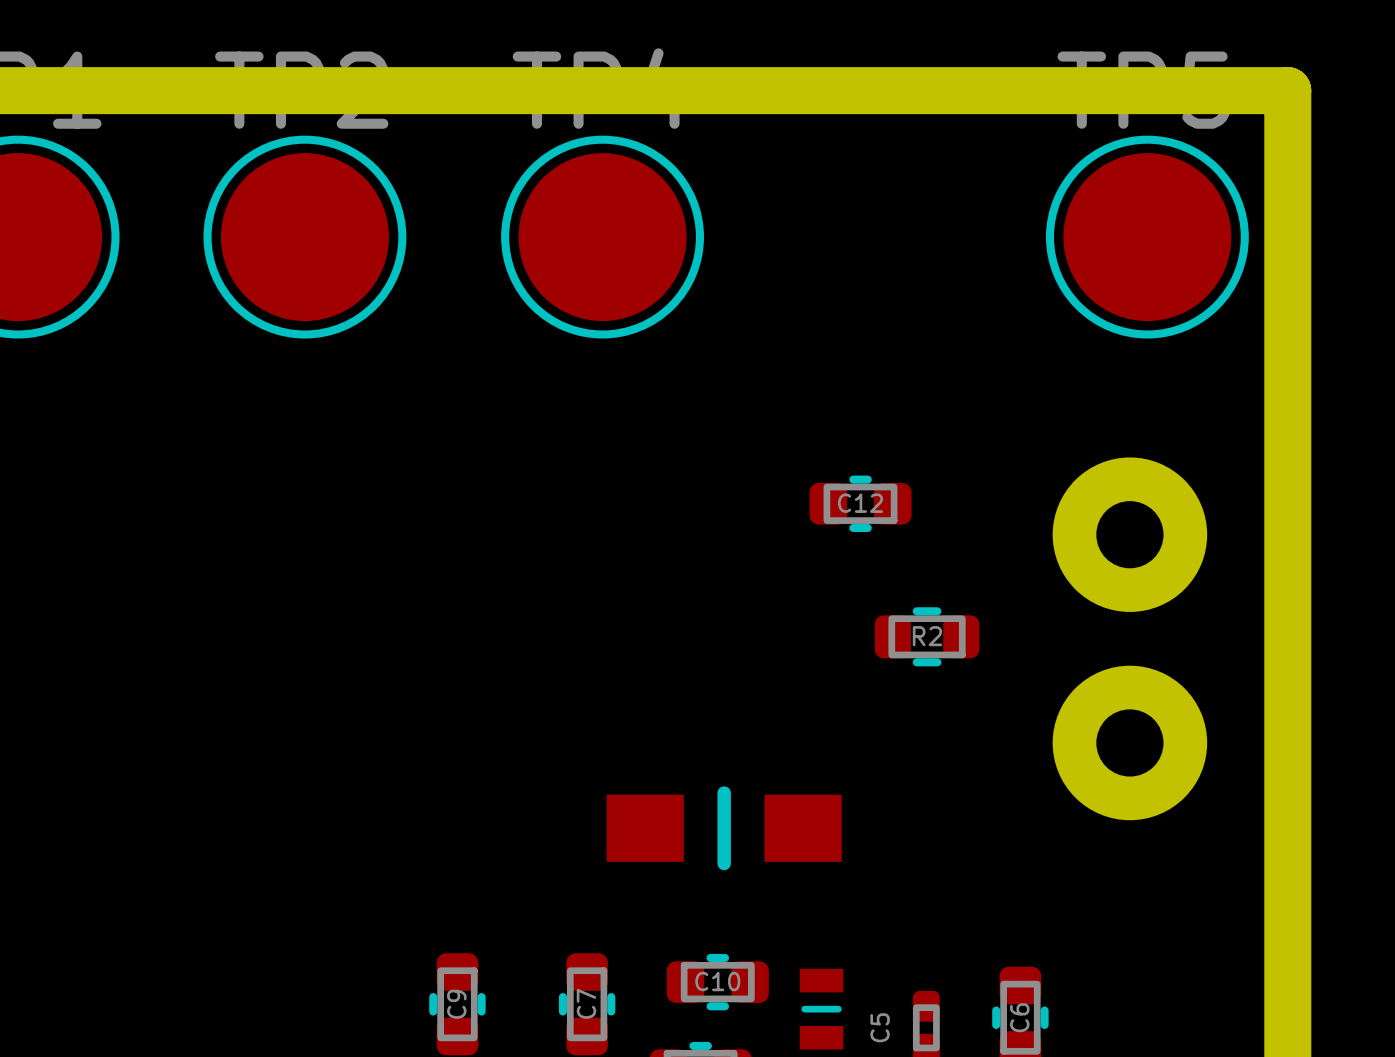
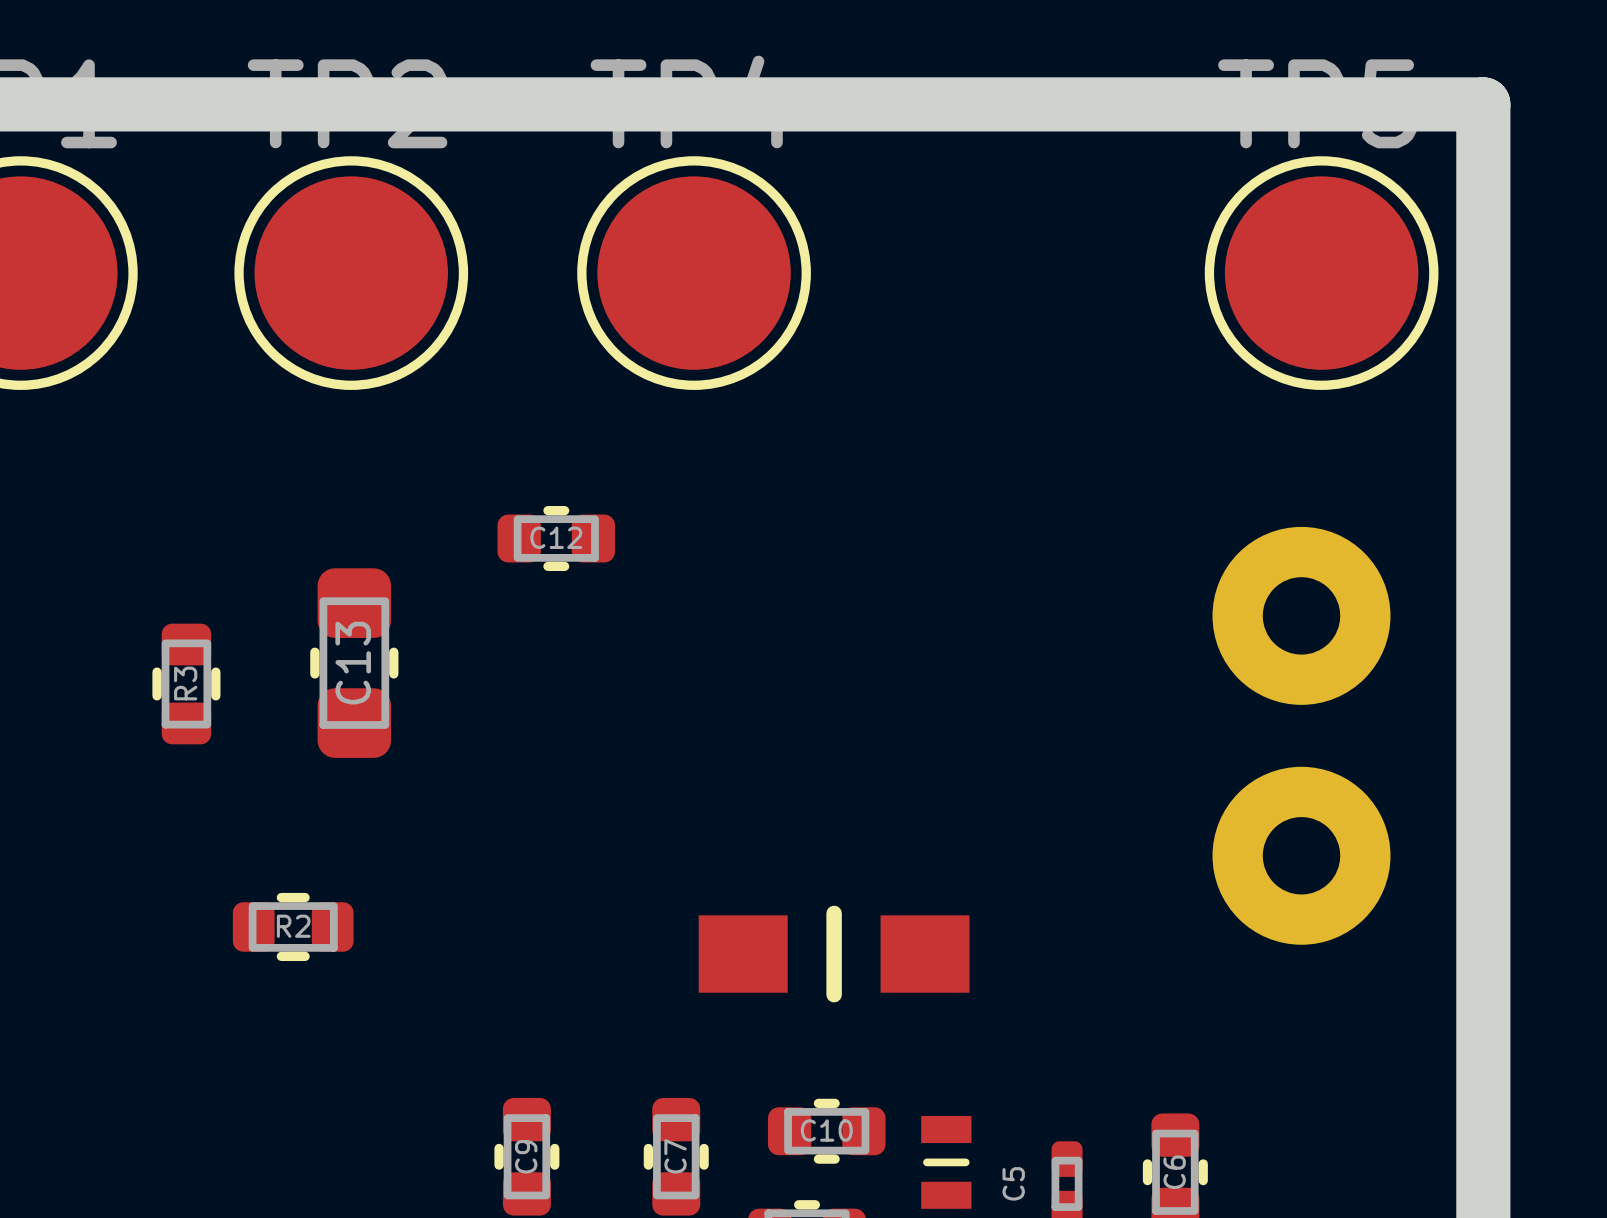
C12 position: (860, 503) -> (556, 538)
C13: none -> (354, 663)
R3: none -> (186, 683)
R2 position: (927, 636) -> (293, 926)

